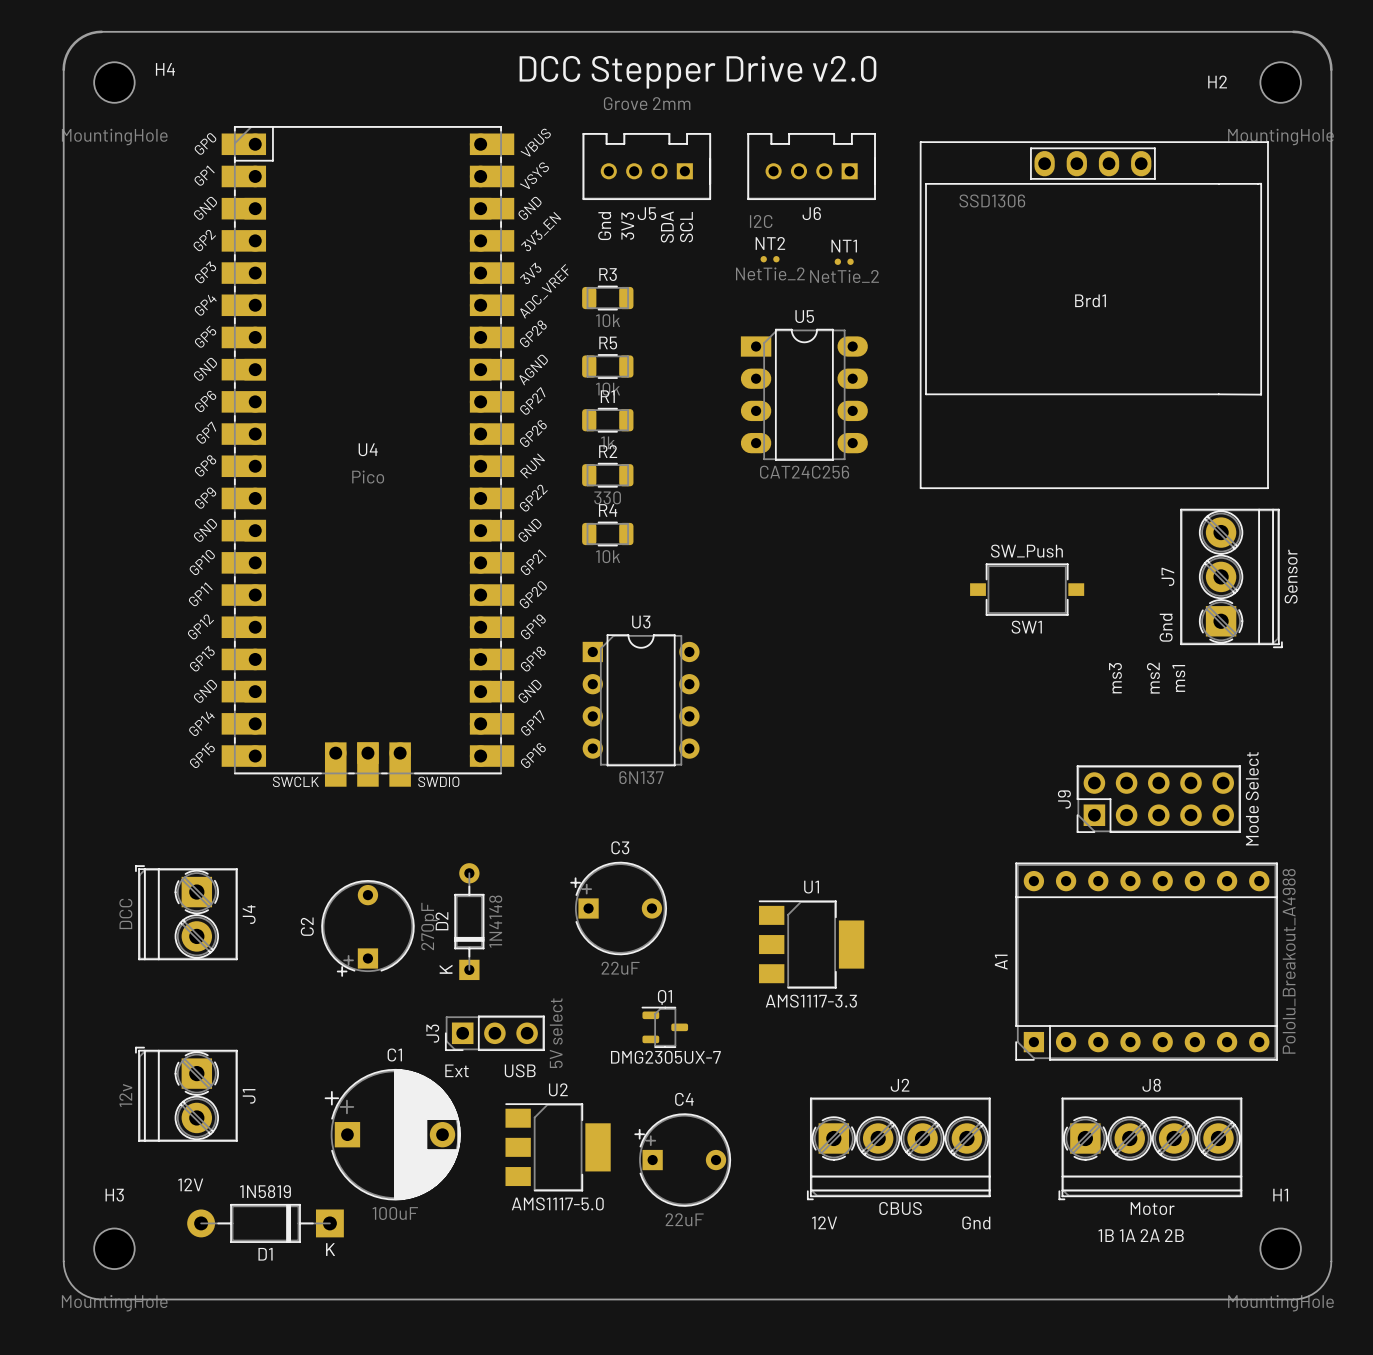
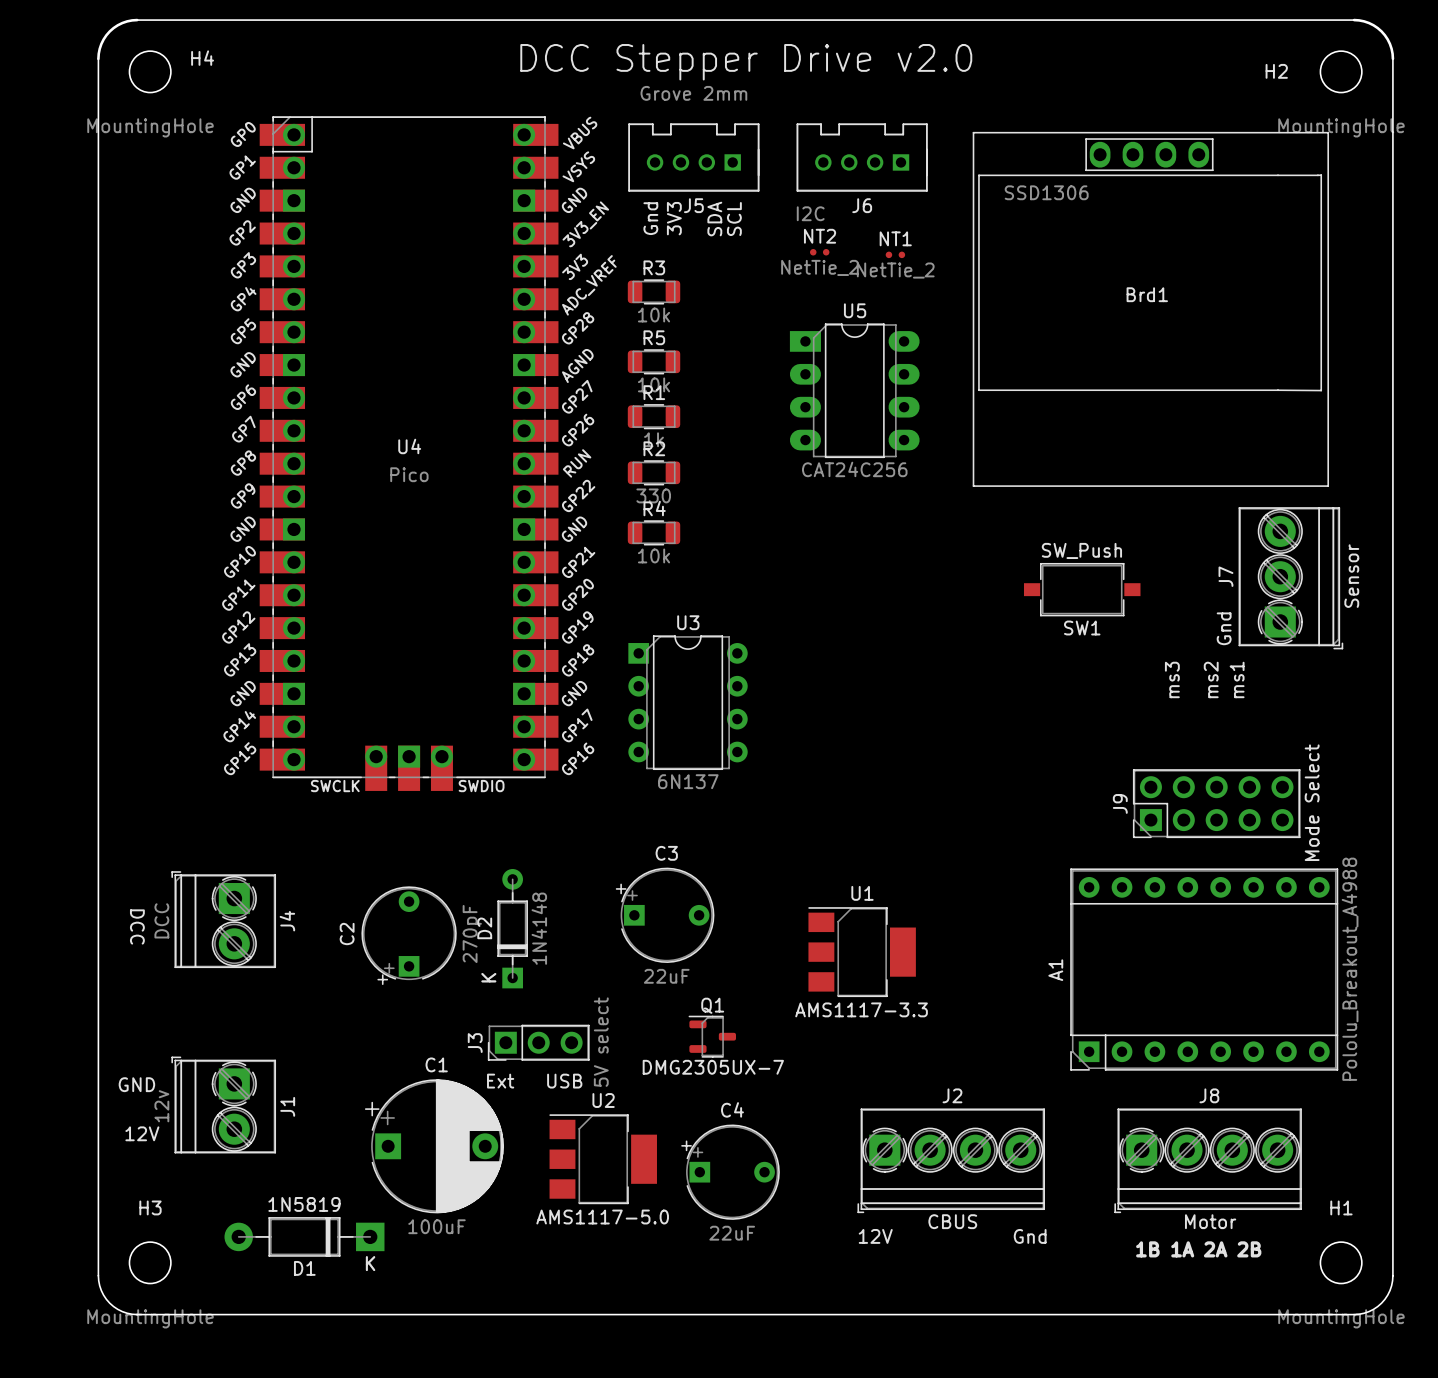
text: none -> DCC (137, 926)
text: none -> GND (136, 1084)
text position: 12V (190, 1184) -> 12V (142, 1133)

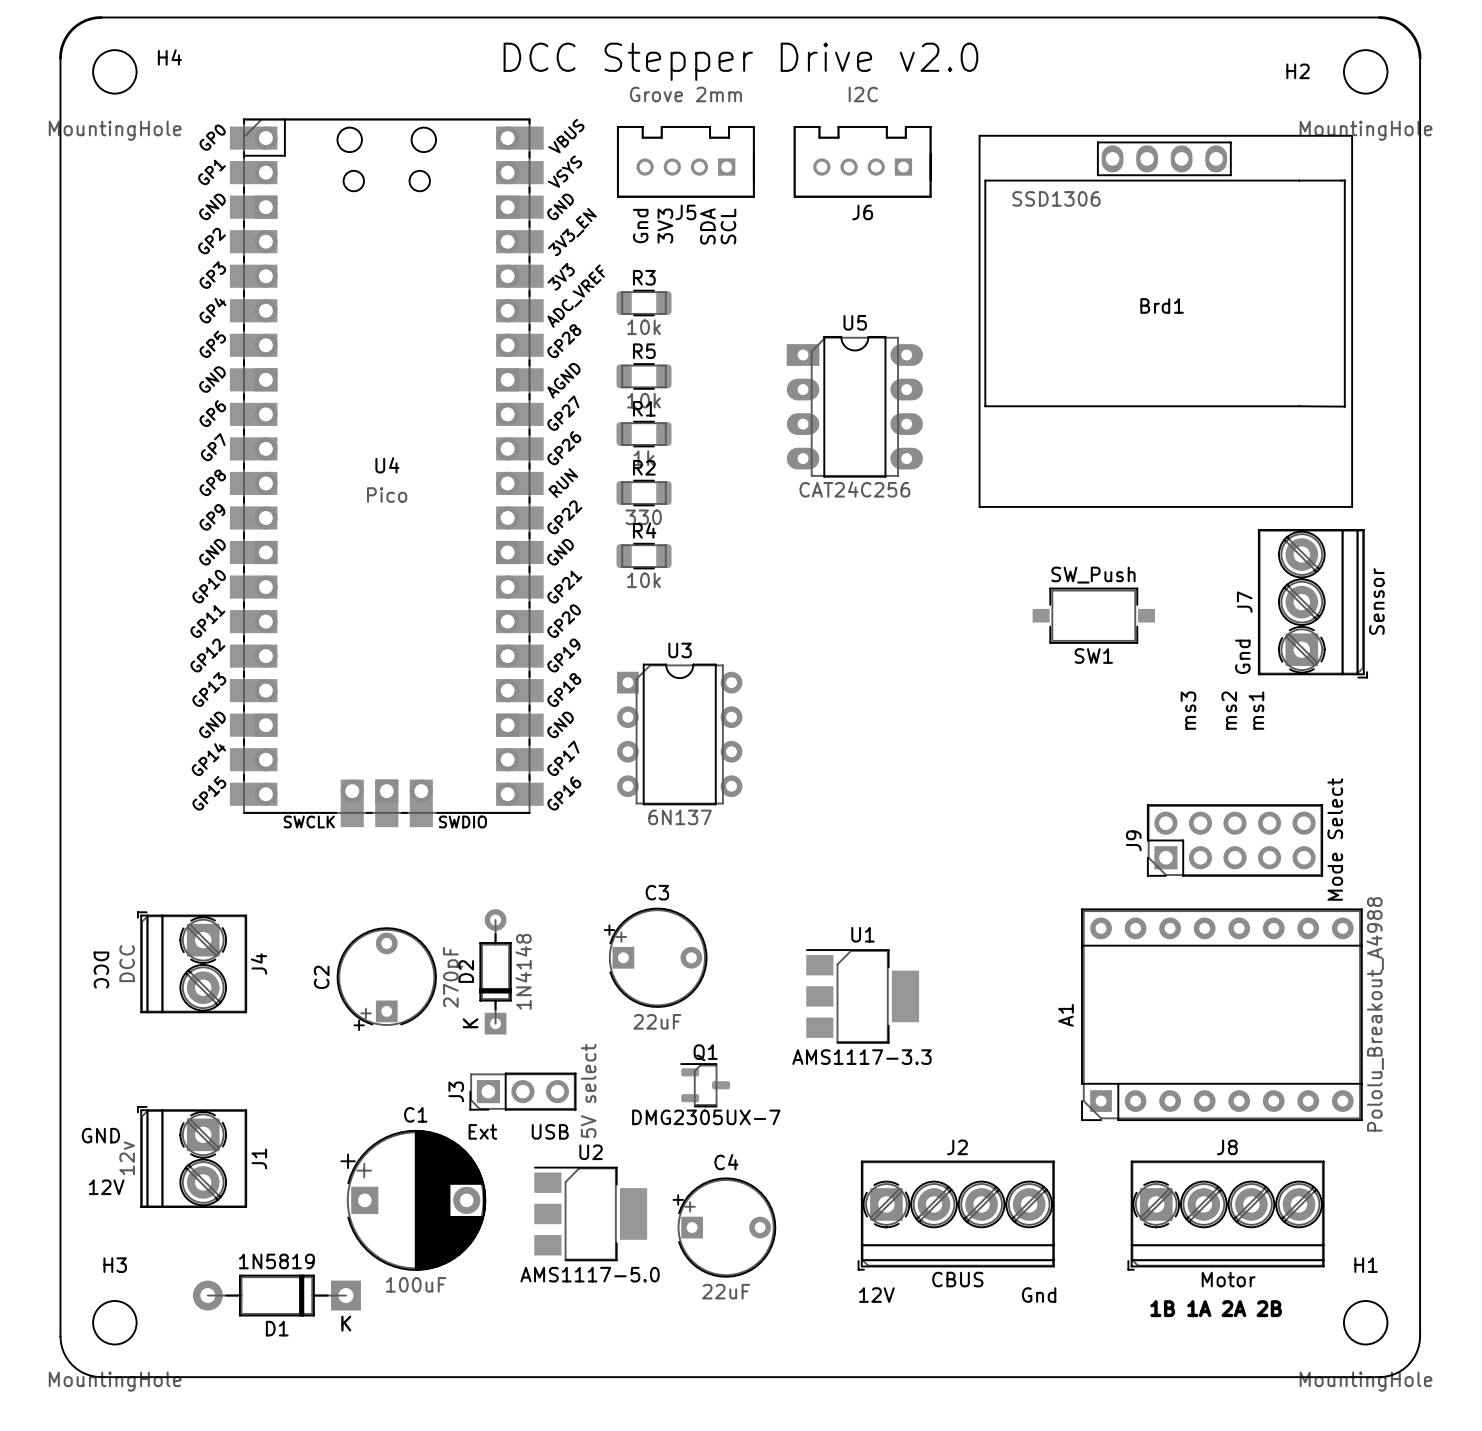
U4 footprint: [259, 116, 559, 791] -> [229, 118, 544, 828]
J6 value position: I2C (810, 213) -> I2C (863, 94)
NT2: NetTie_2 (819, 252) -> none
NT1: NetTie_2 (895, 254) -> none

